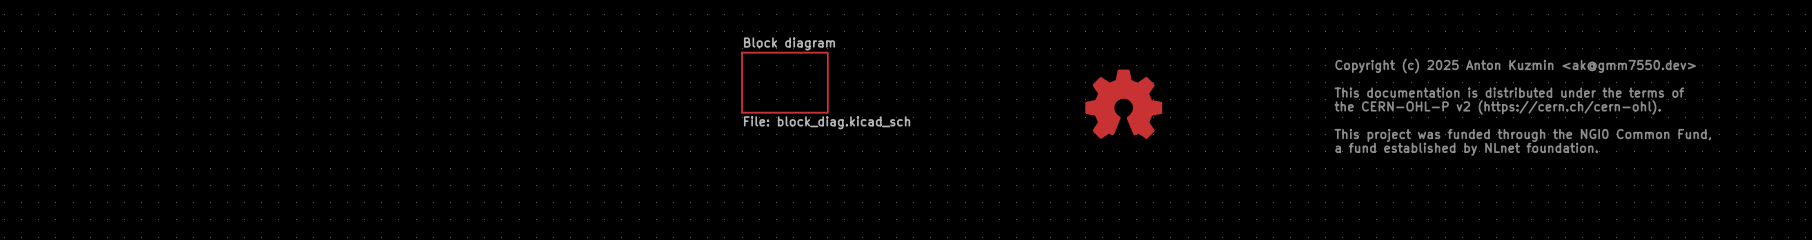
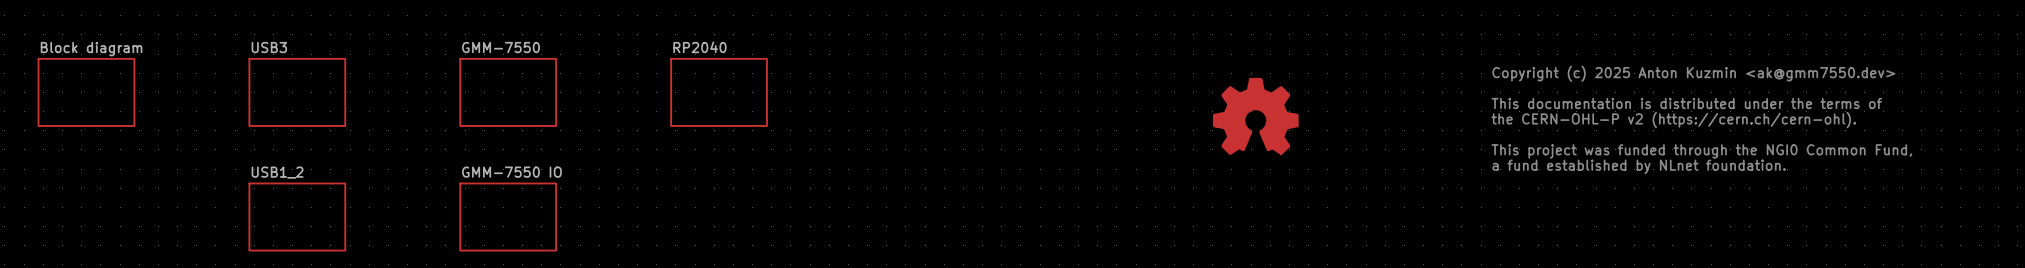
sheet Block diagram: none -> (86, 92)
sheet USB3: none -> (297, 92)
sheet GMM-7550: none -> (508, 92)
sheet RP2040: none -> (719, 92)
sheet Block diagram: File: block_diag.kicad_sch (784, 82) -> none
sheet USB1_2: none -> (297, 217)
sheet GMM-7550 IO: none -> (508, 217)

